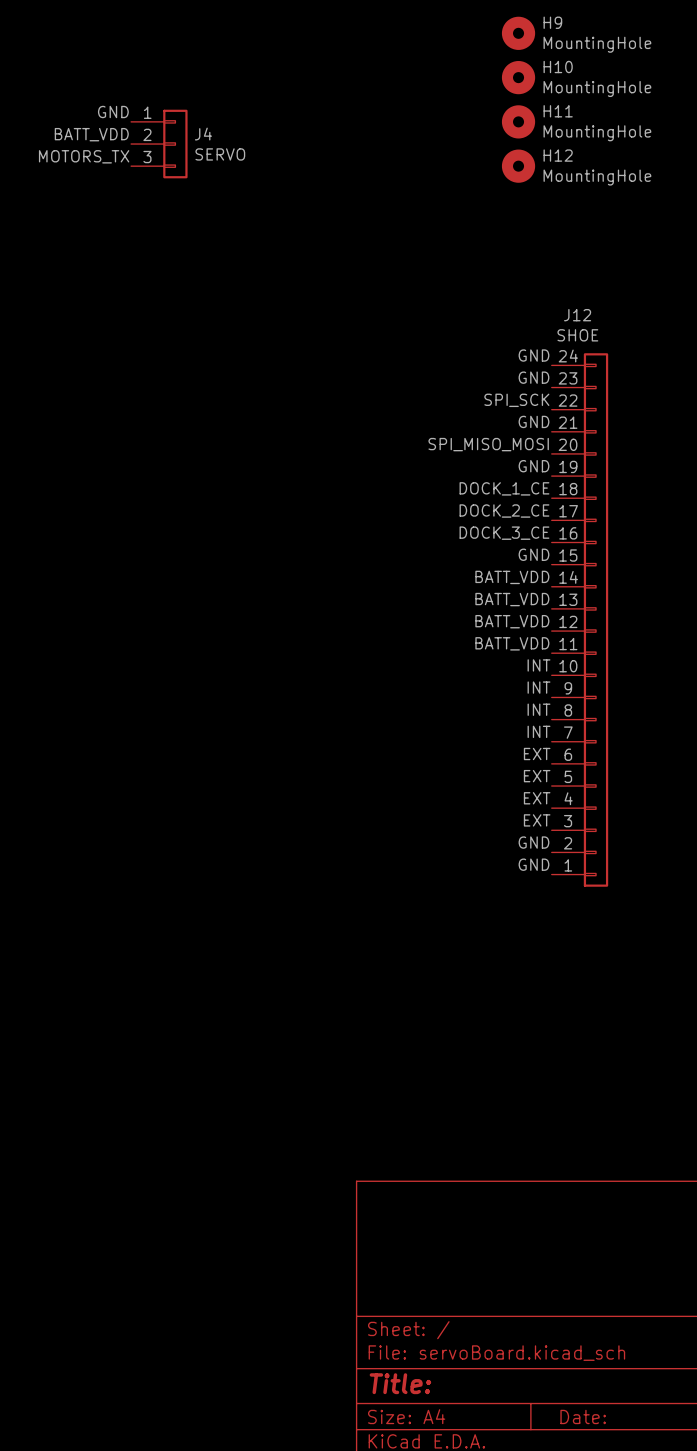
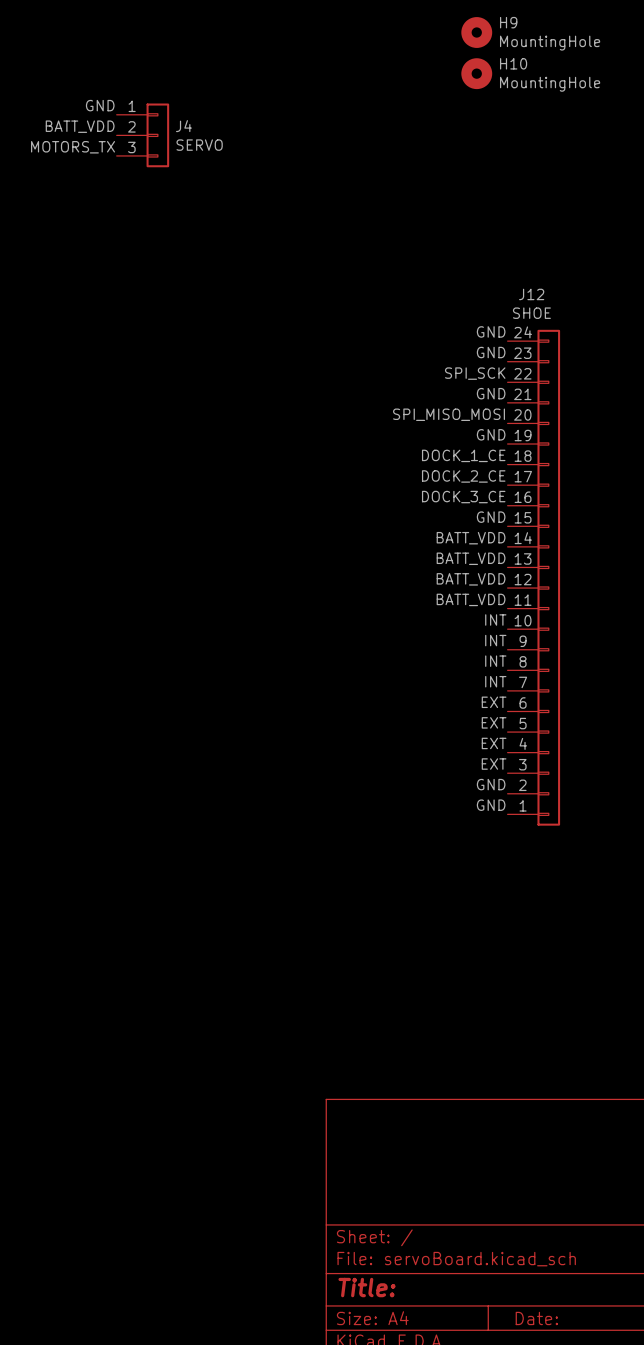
H11: MountingHole (518, 121) -> none
H12: MountingHole (518, 166) -> none

